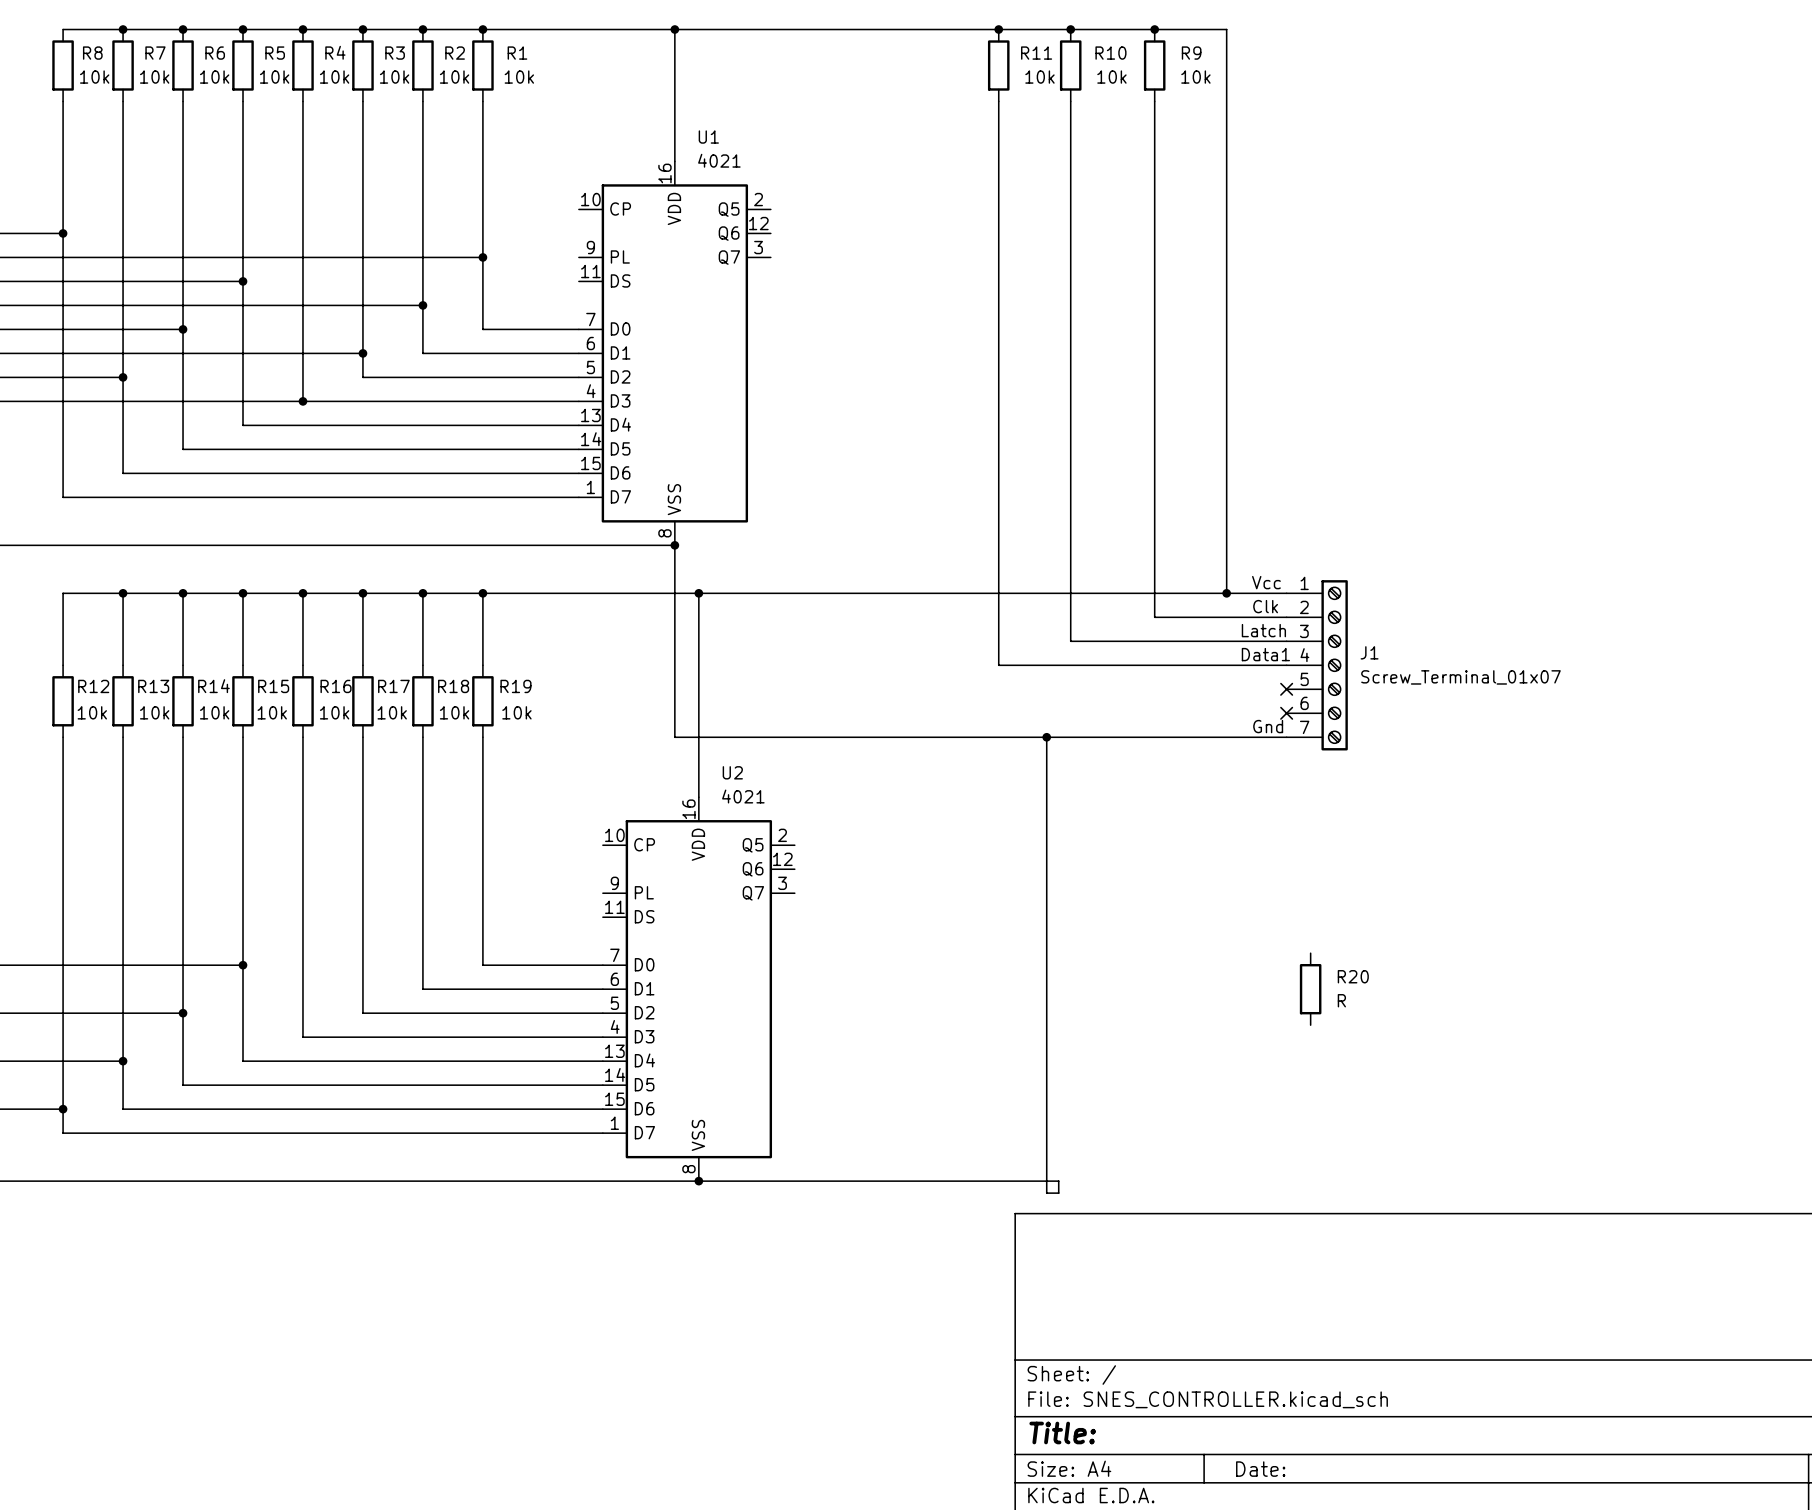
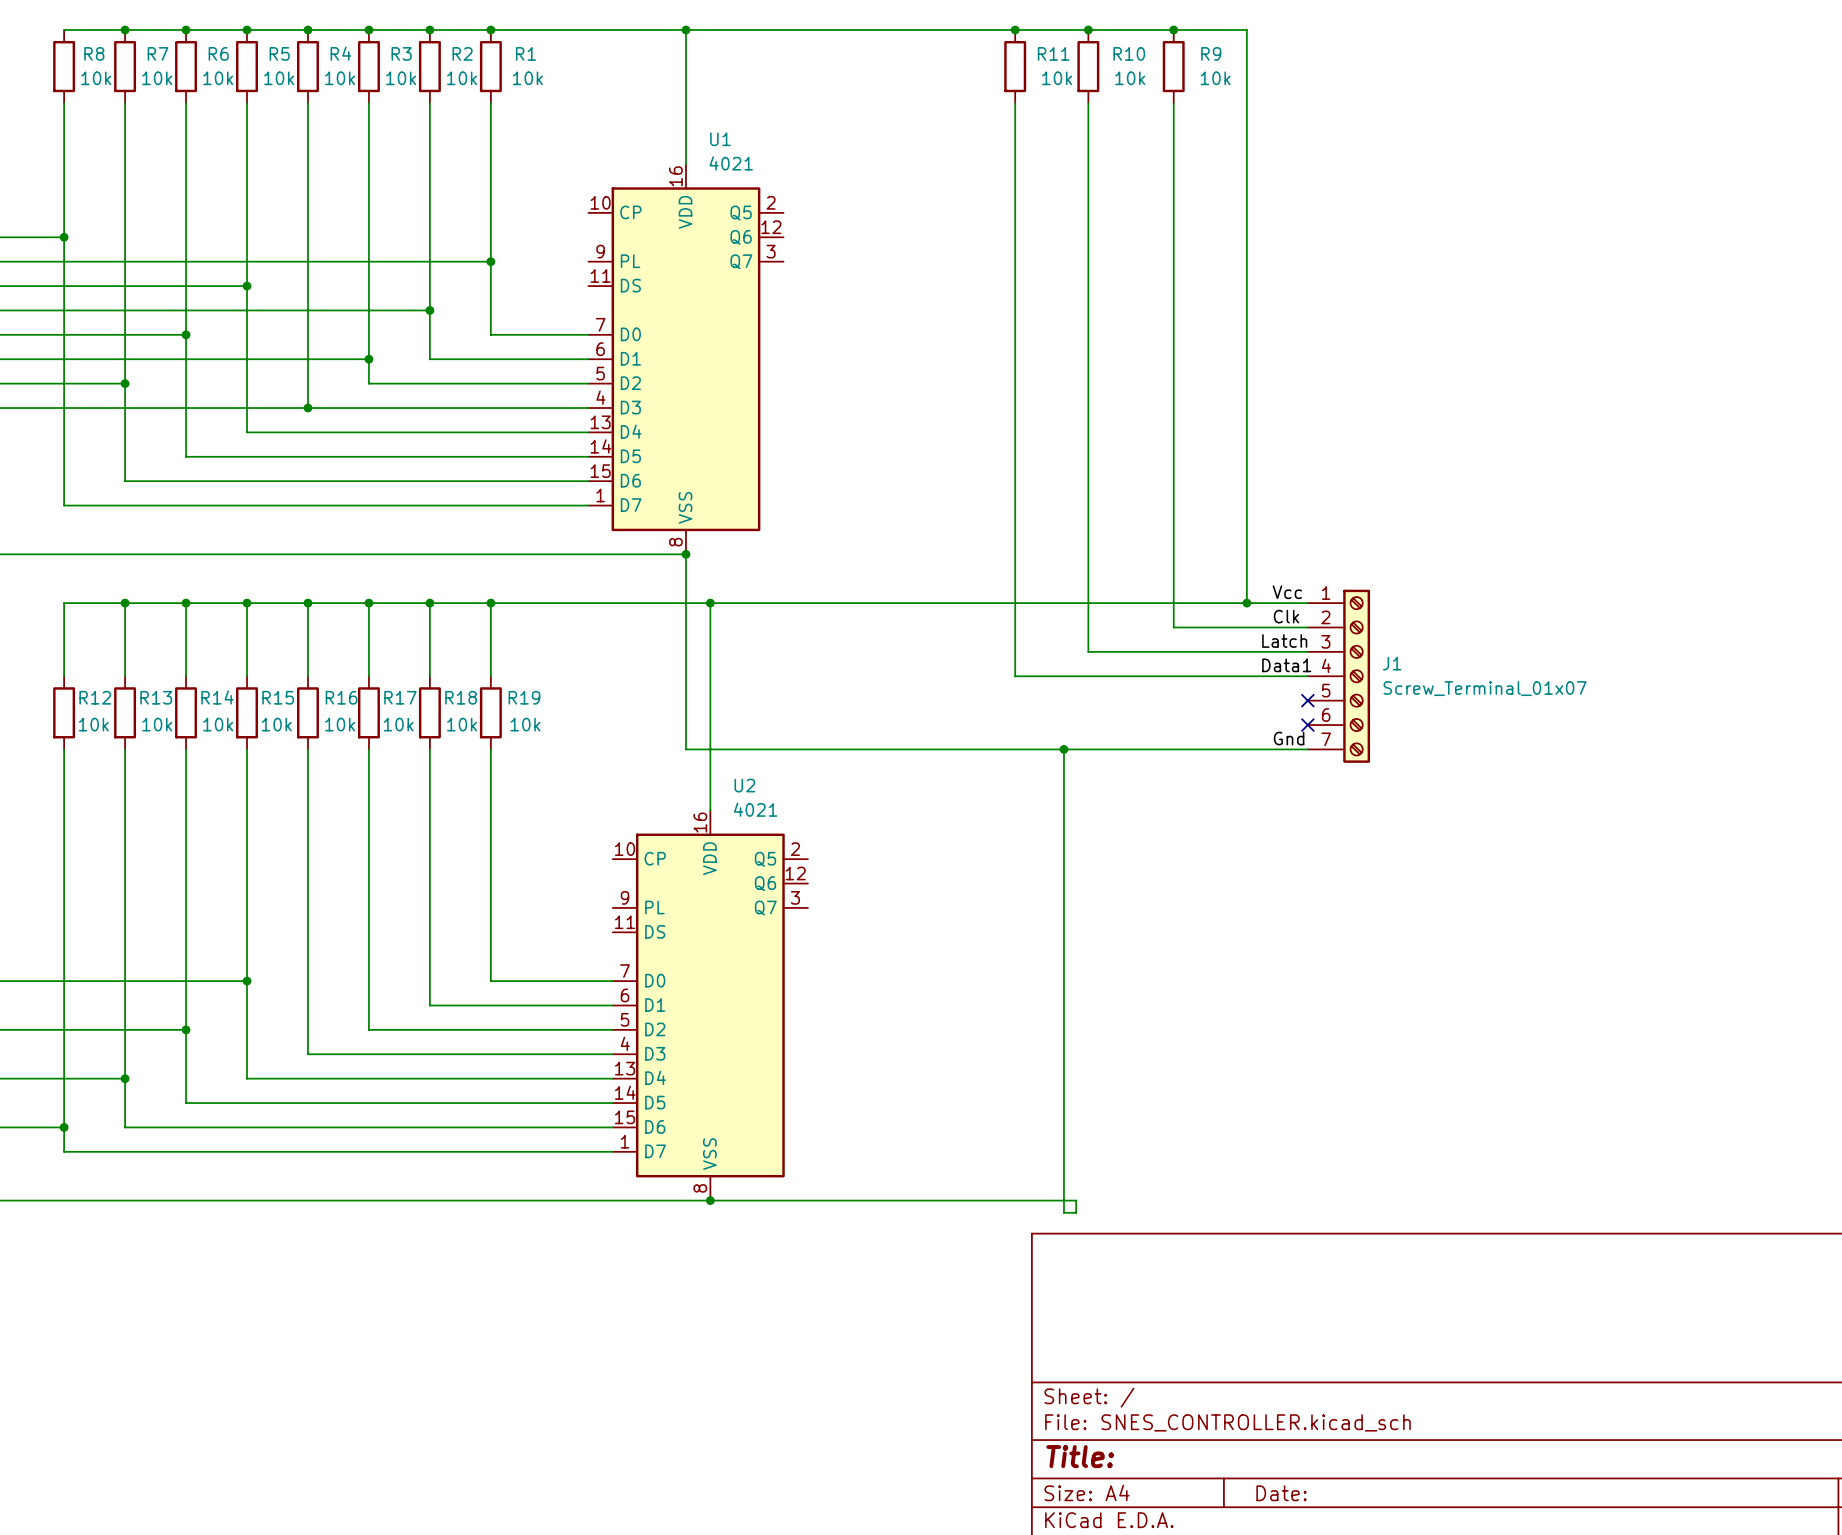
R20: R (1310, 989) -> none

